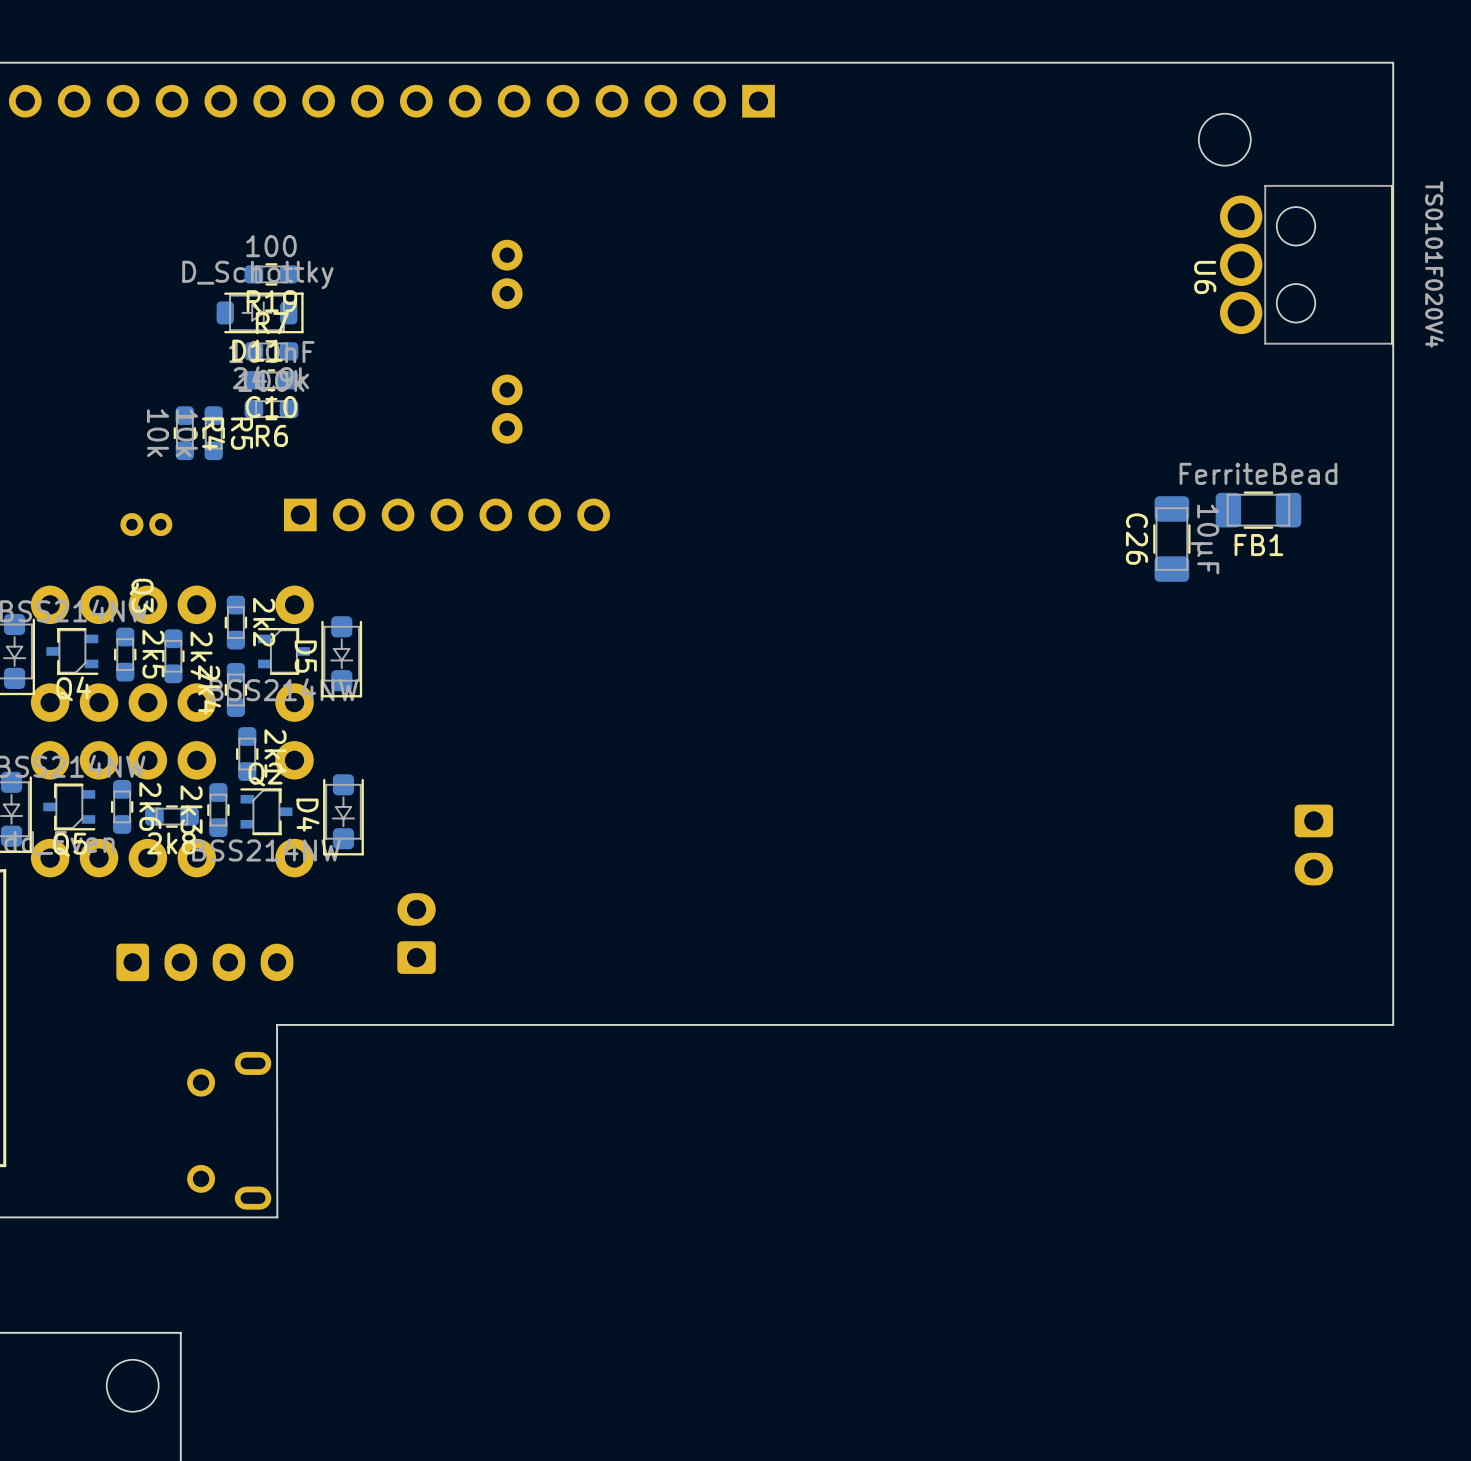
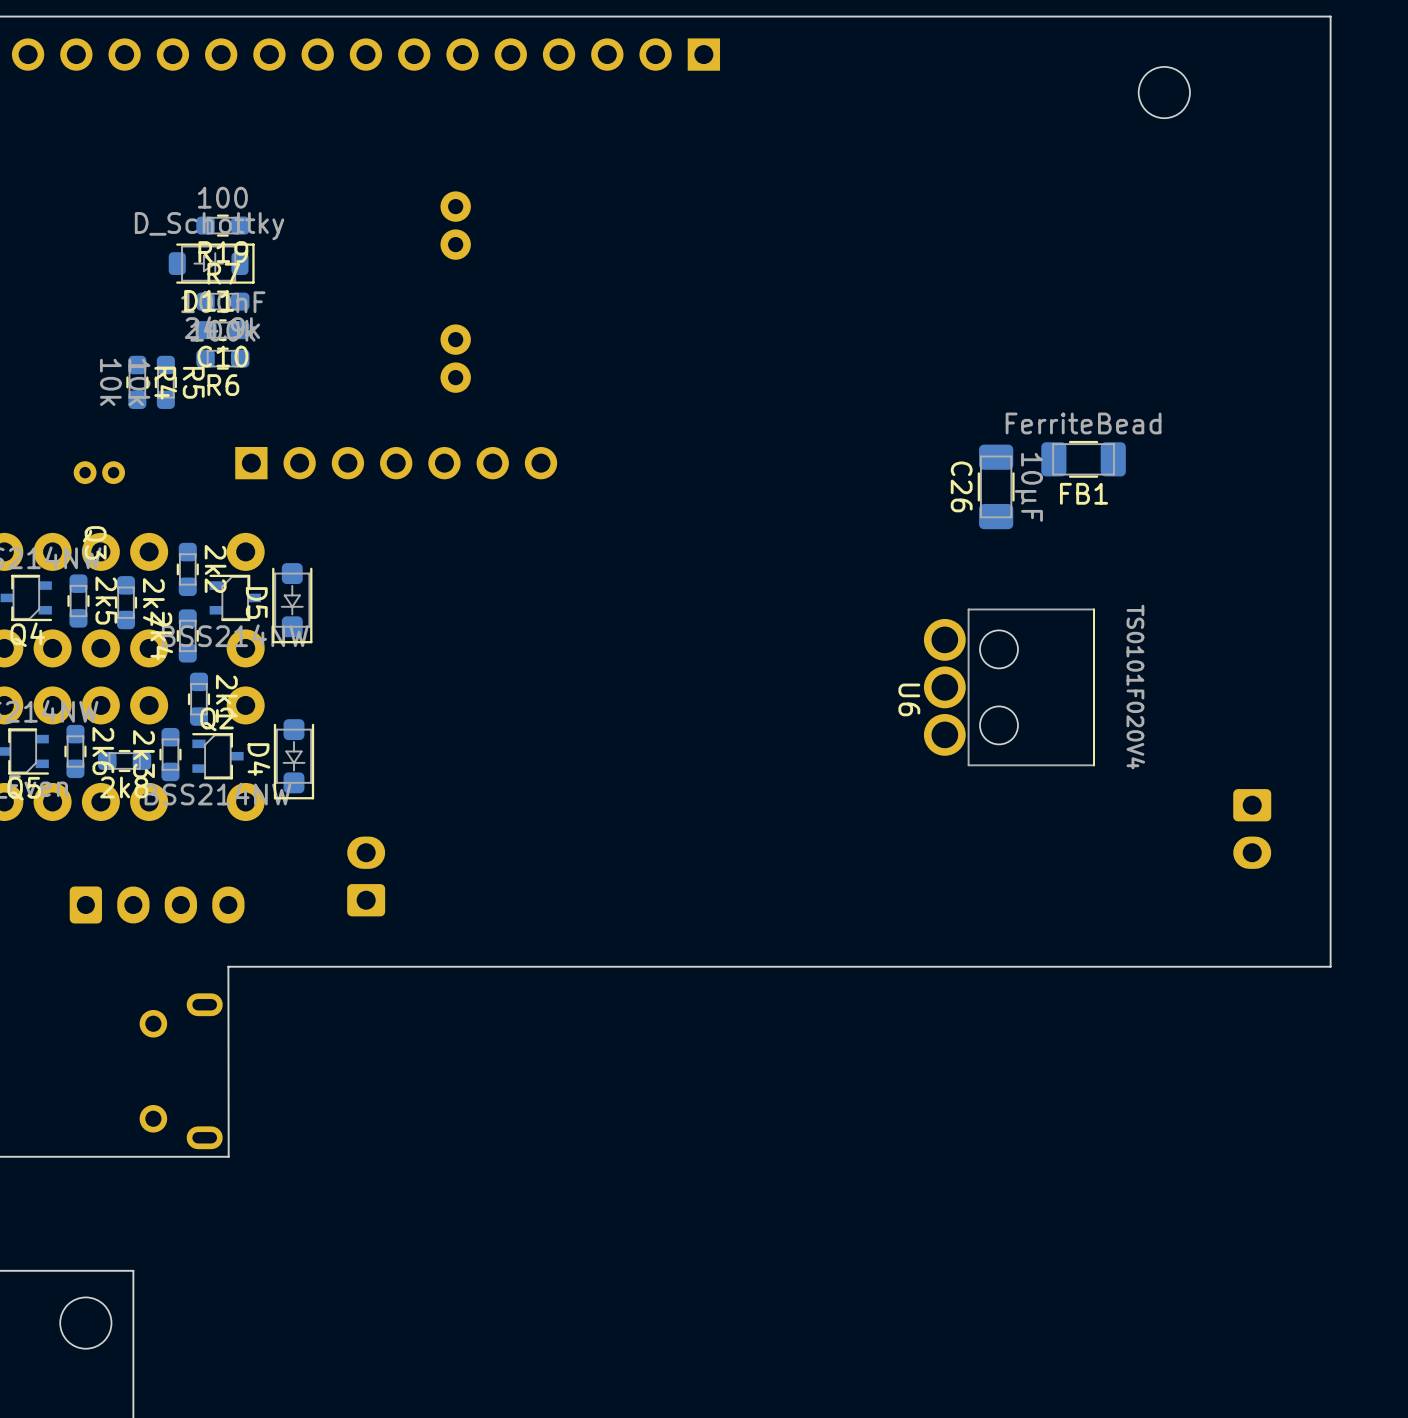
U6 position: (1306, 264) -> (1009, 687)
FB1 position: (1258, 510) -> (1083, 459)
C26 position: (1171, 539) -> (996, 486)
part position: (1313, 845) -> (1252, 828)

